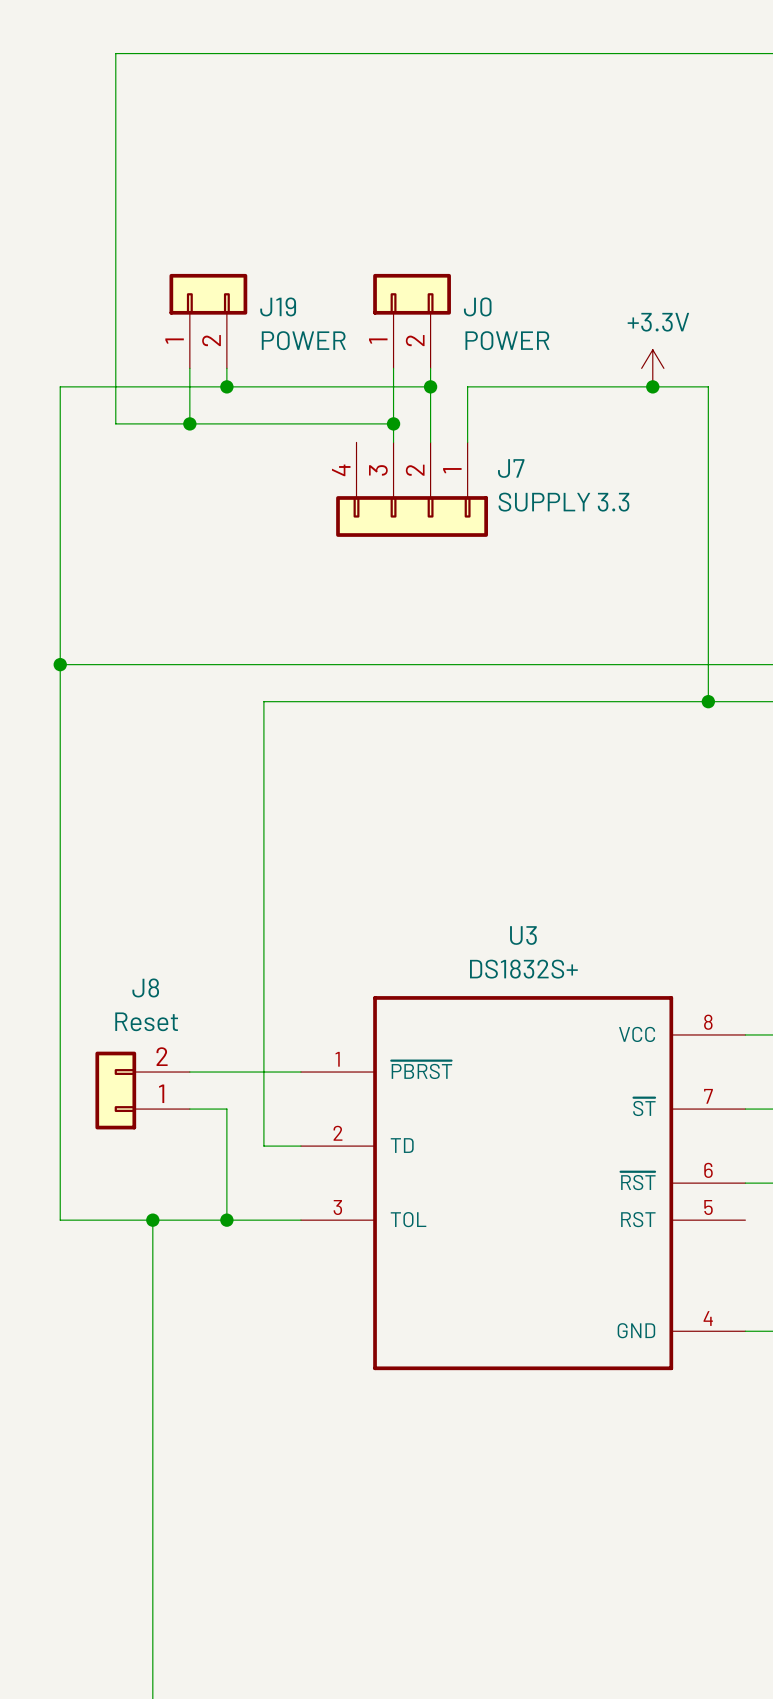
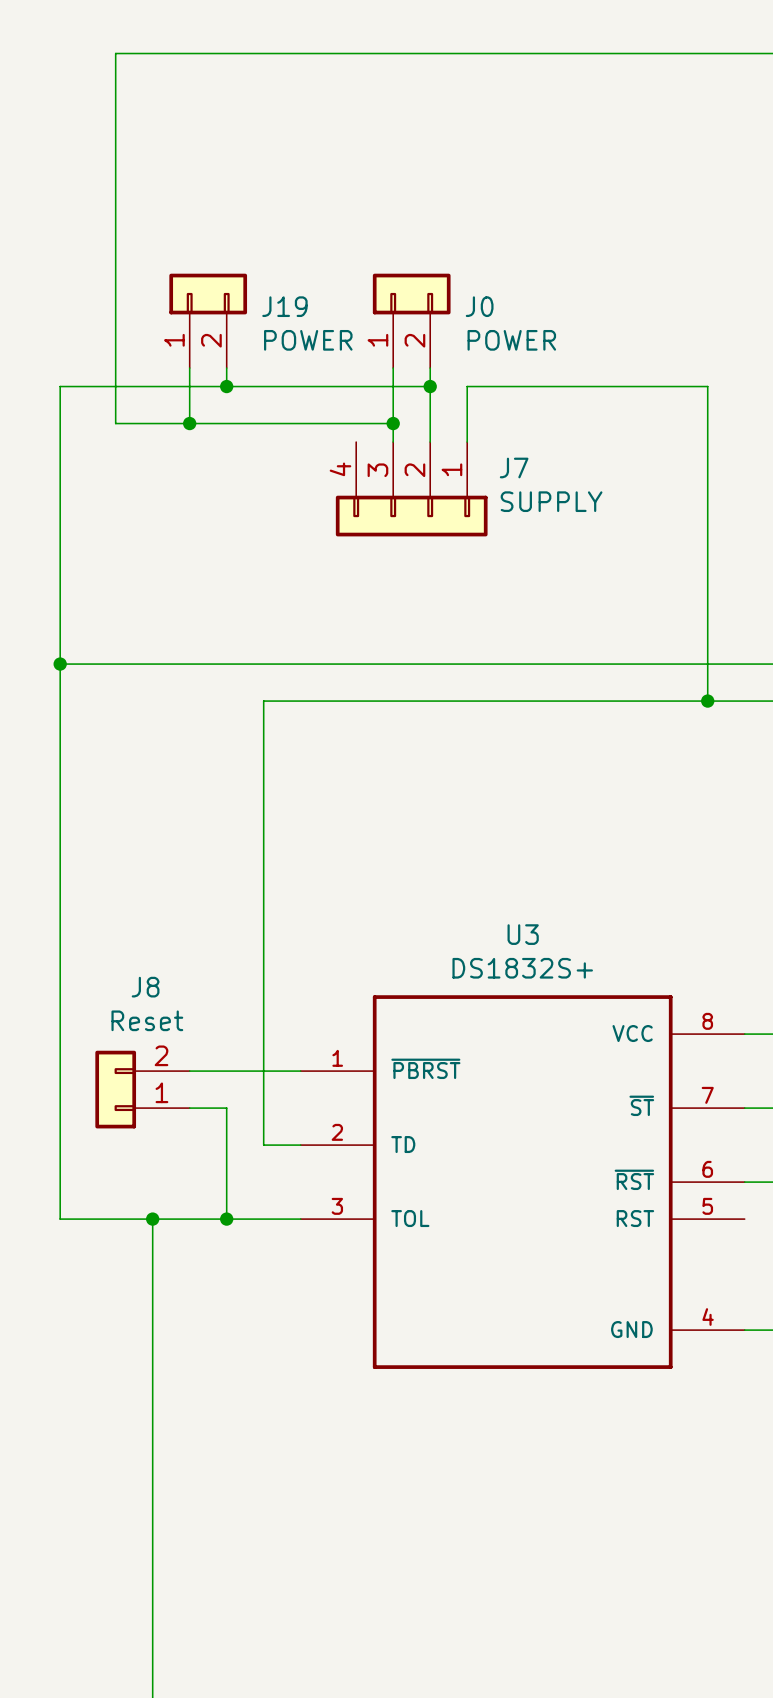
power symbol: +3.3V (652, 368) -> none
junction: (652, 386) -> none
J7 value: SUPPLY 3.3 (563, 502) -> SUPPLY (551, 501)

